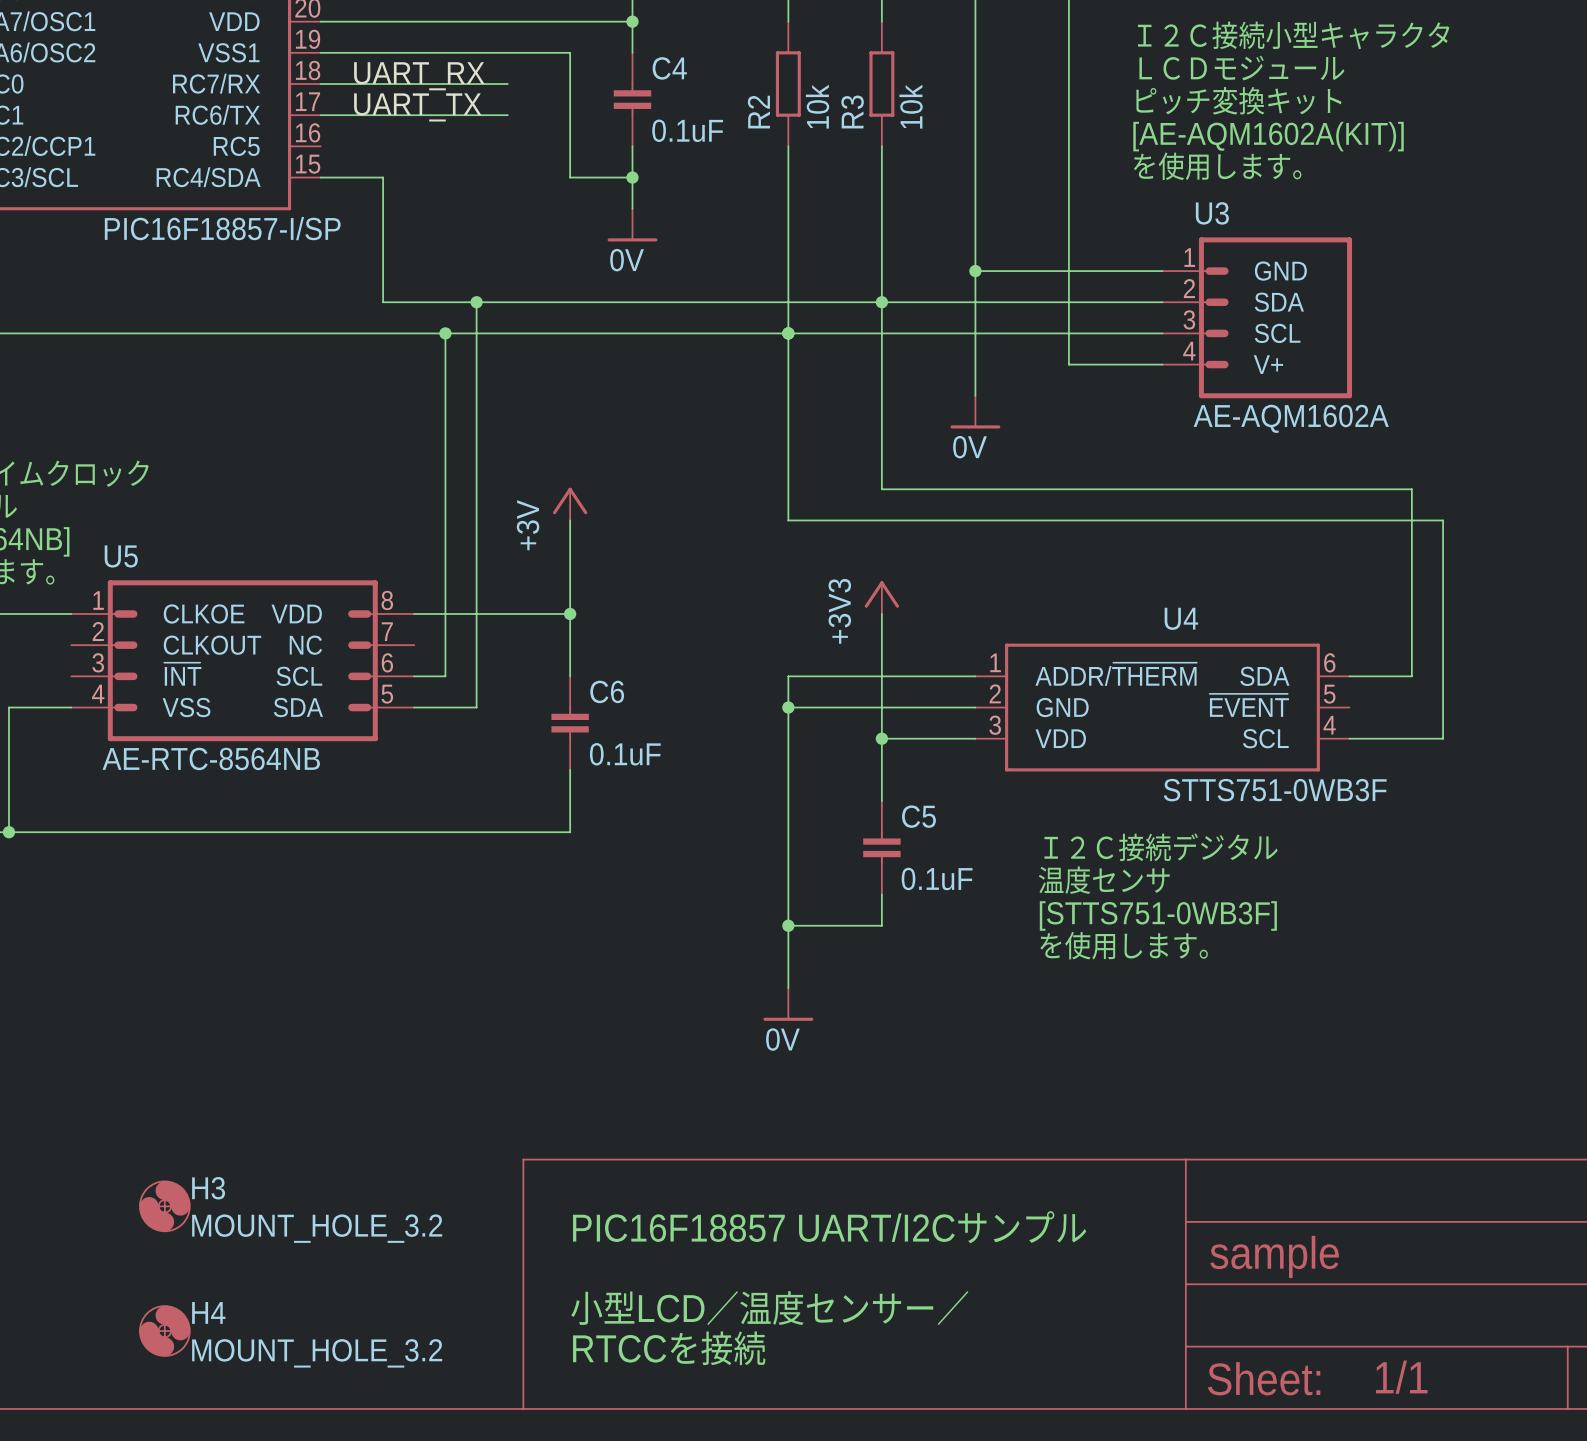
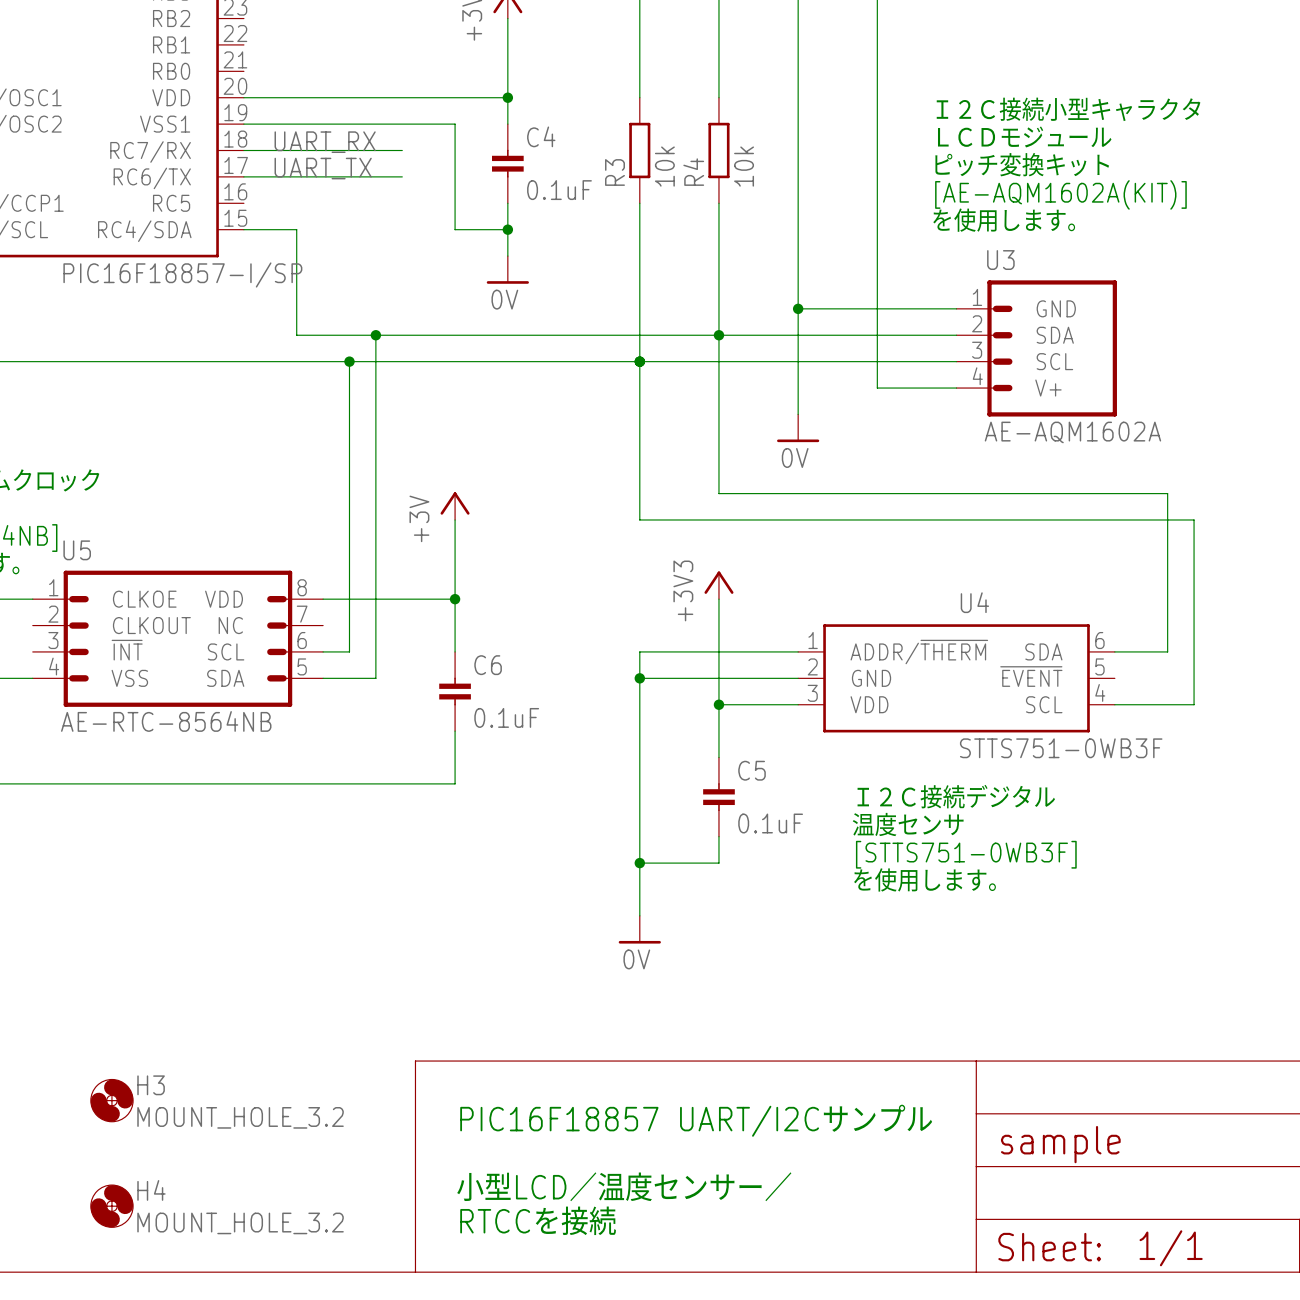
R3 name: R3 (852, 111) -> R4 (693, 172)
R2 name: R2 (758, 112) -> R3 (614, 172)

